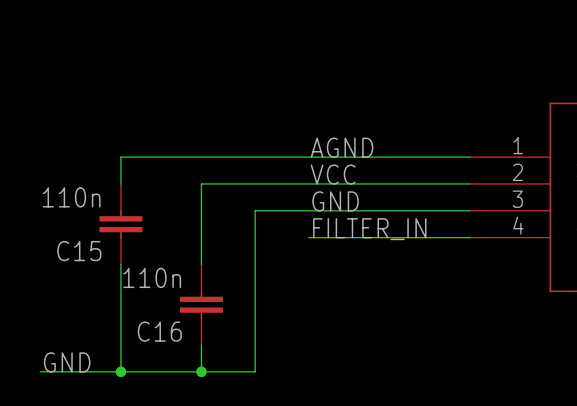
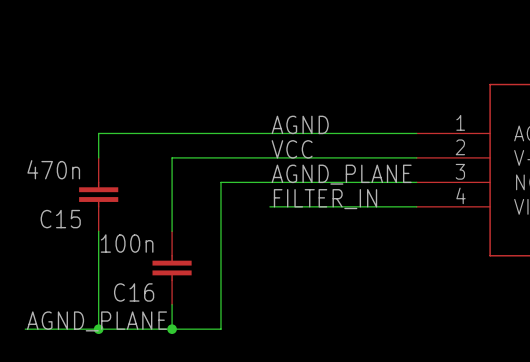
C15 value: 110n (71, 197) -> 470n (53, 169)
label: GND (335, 201) -> AGND_PLANE (341, 174)
C16 value: 110n (152, 277) -> 100n (127, 243)
label: GND (67, 362) -> AGND_PLANE (97, 321)

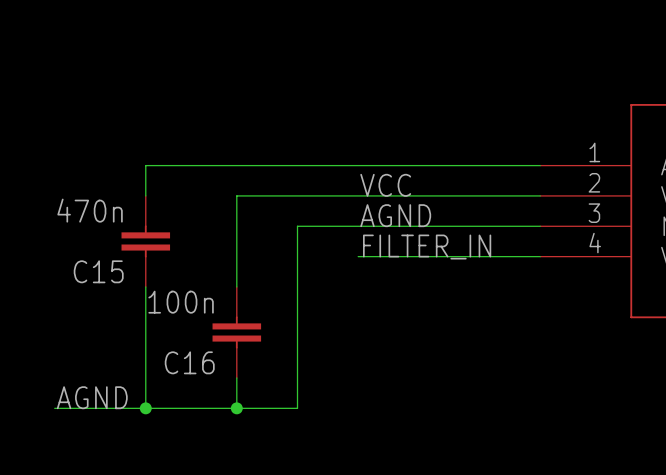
label: AGND (300, 124) -> none
label: AGND_PLANE (341, 174) -> AGND (395, 215)
label: AGND_PLANE (97, 321) -> AGND (92, 397)

